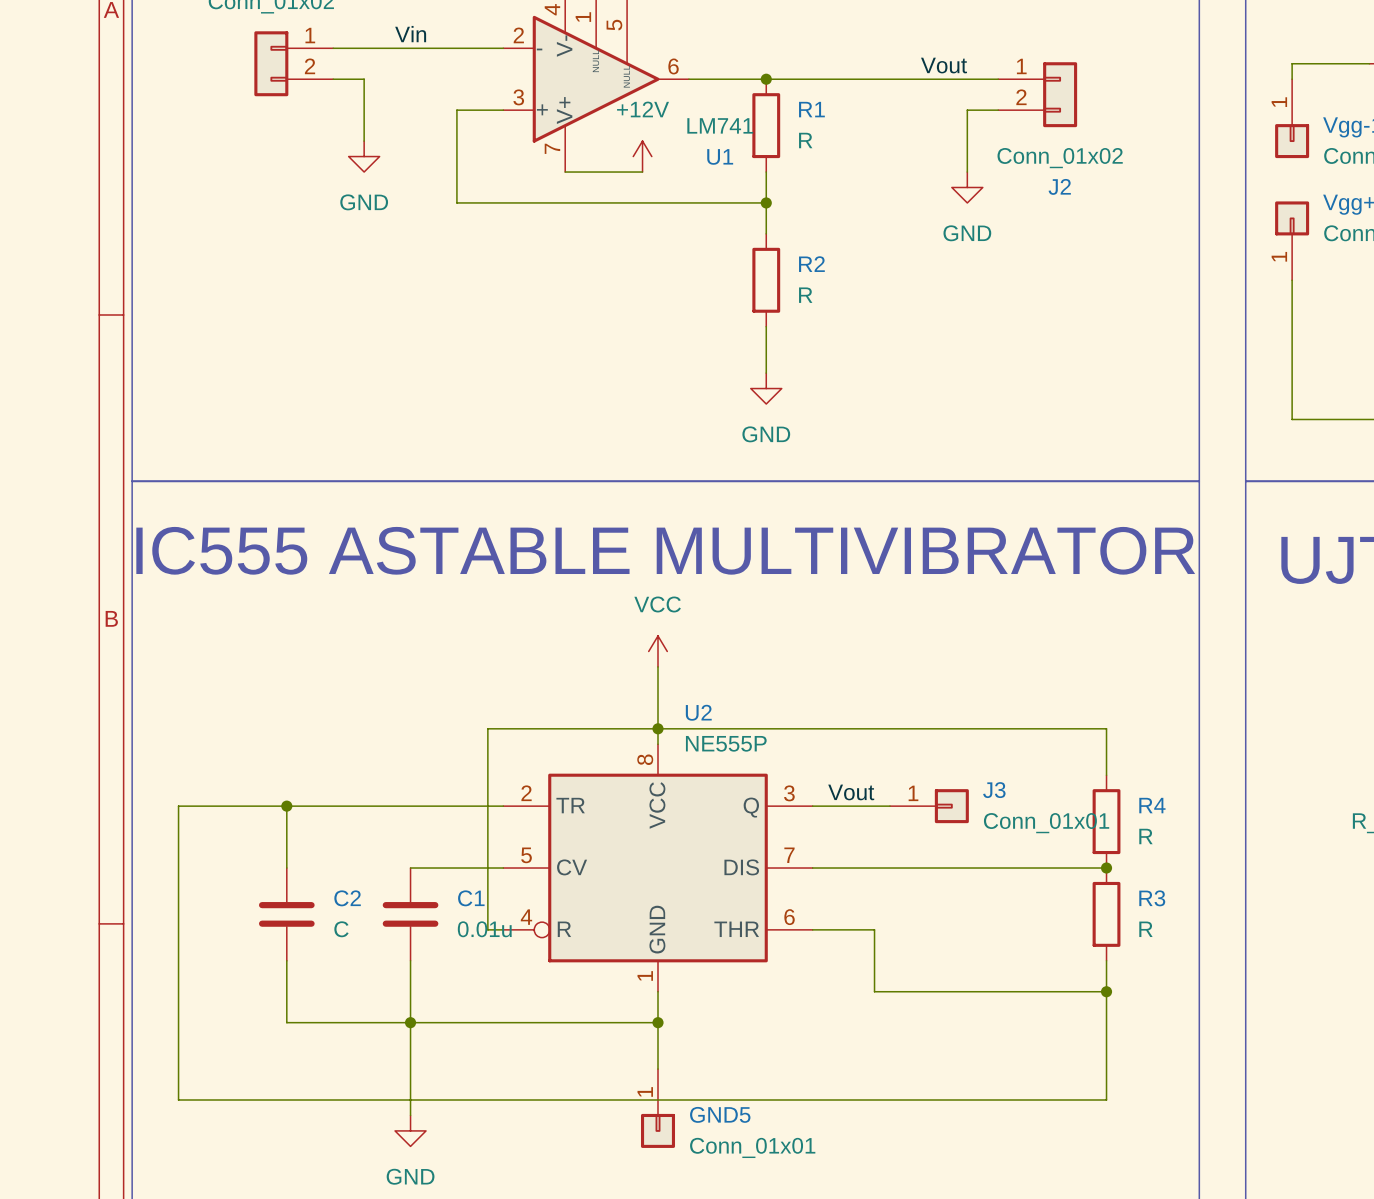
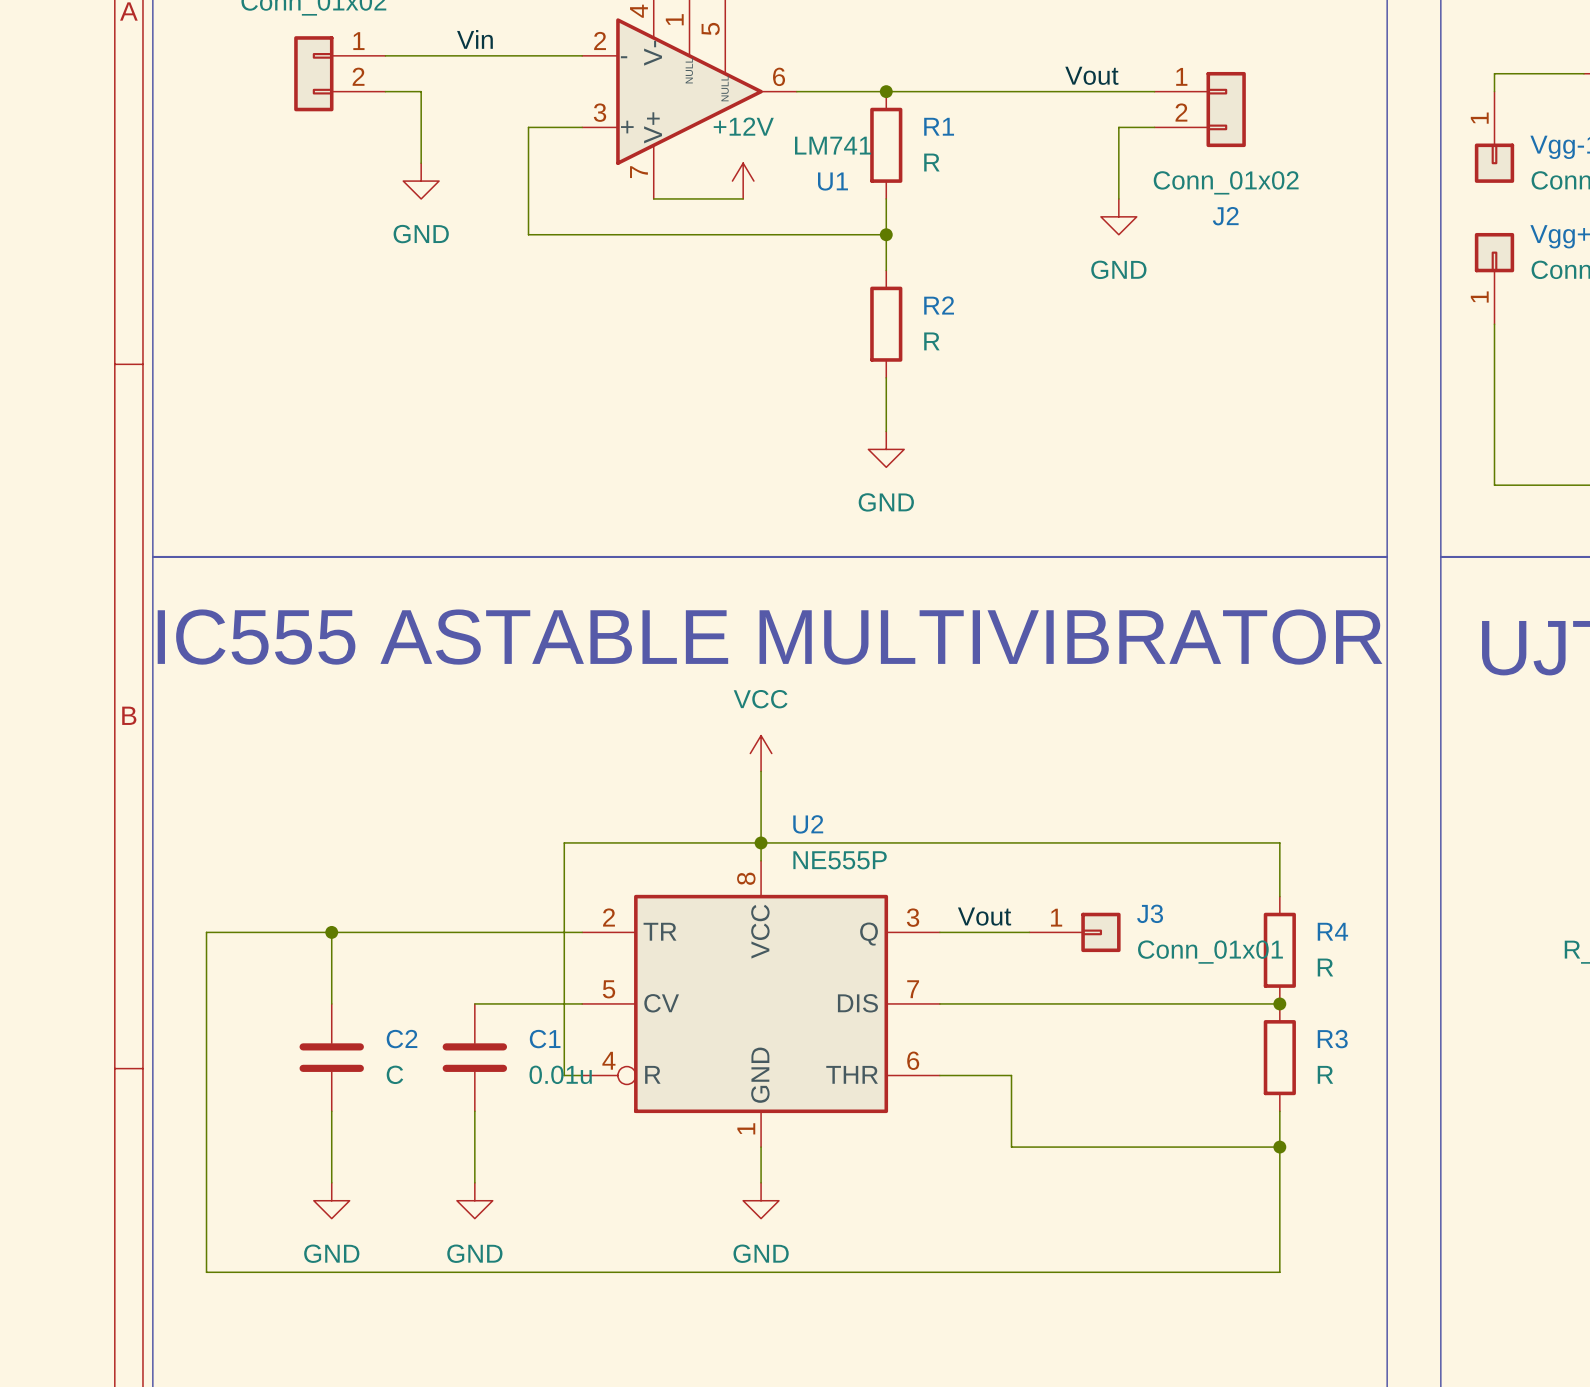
wire: (286, 1022) (658, 1022) (658, 1069) -> none
wire: (410, 1022) (410, 1115) -> none
junction: (410, 1022) -> none
junction: (658, 1022) -> none
power symbol: none -> GND (331, 1200)
power symbol: none -> GND (474, 1200)
power symbol: none -> GND (761, 1200)
GND5: Conn_01x01 (658, 1108) -> none
power symbol: GND (410, 1130) -> none

